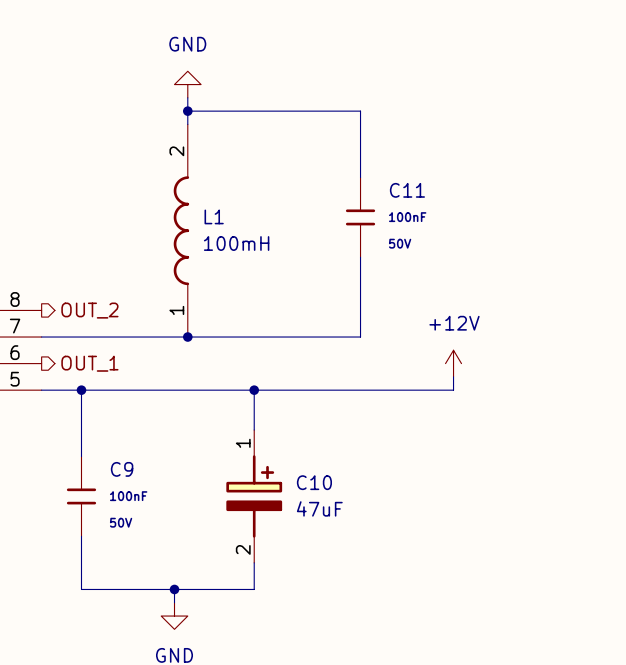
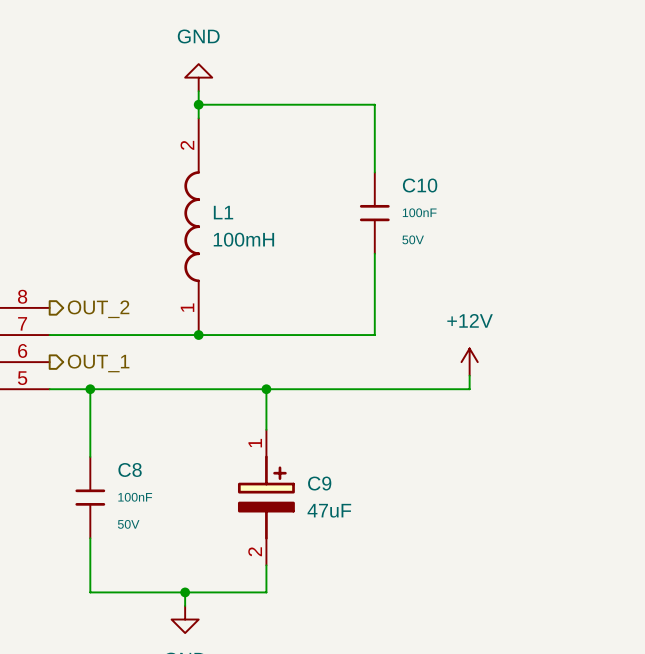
C11 name: C11 (407, 190) -> C10 (420, 185)
C9 name: C9 (122, 469) -> C8 (130, 469)
C10 name: C10 (314, 482) -> C9 (319, 483)

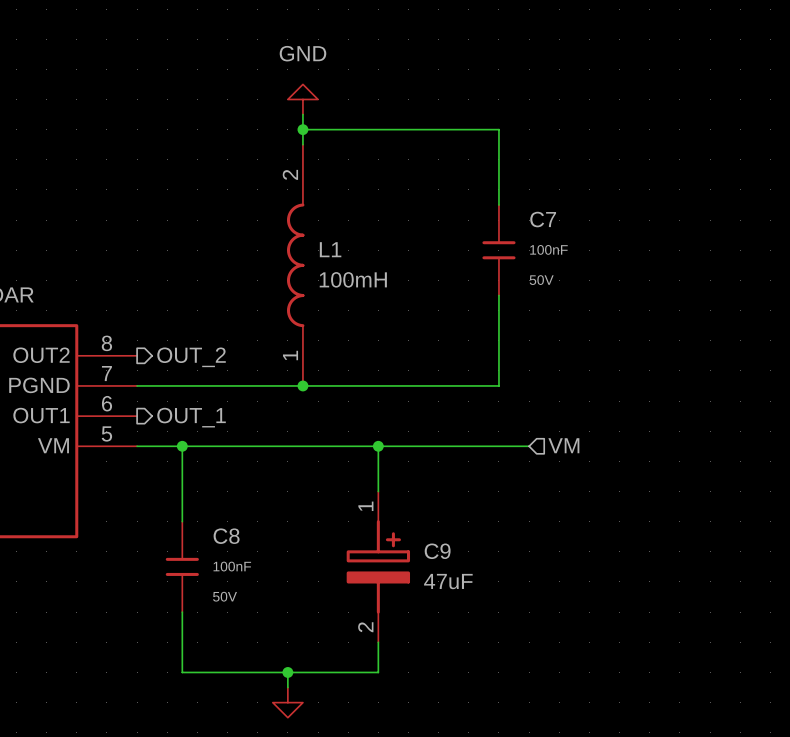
C10 name: C10 (420, 185) -> C7 (543, 219)
power symbol: +12V (469, 362) -> none
wire: (469, 375) (469, 389) (401, 389) -> none
hierarchical label: none -> VM (563, 445)

